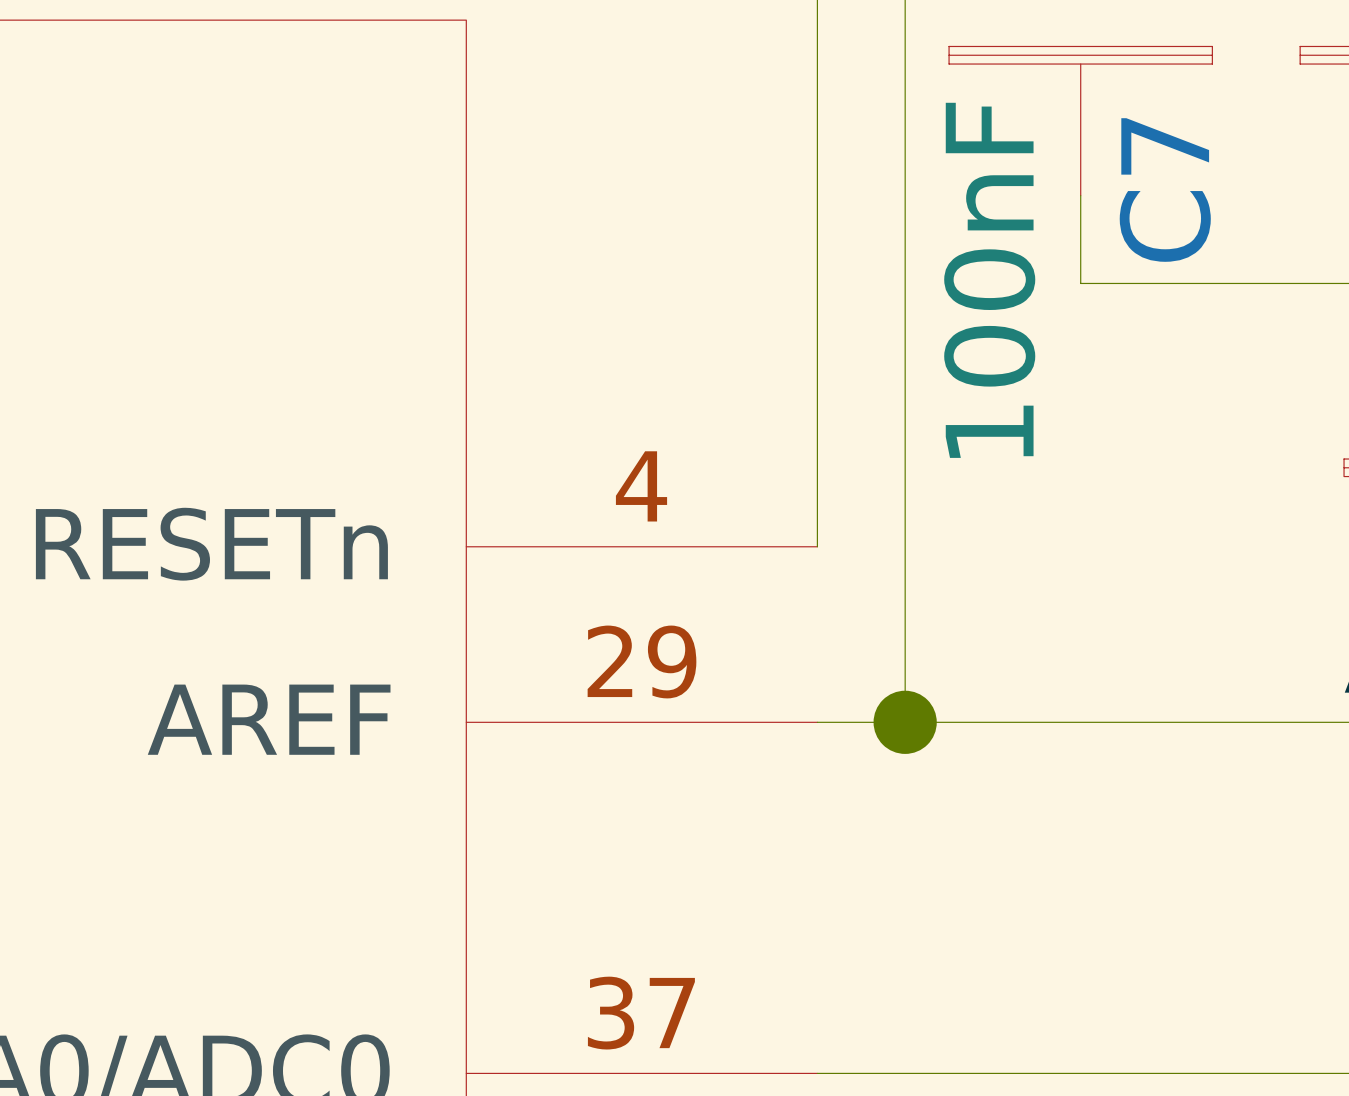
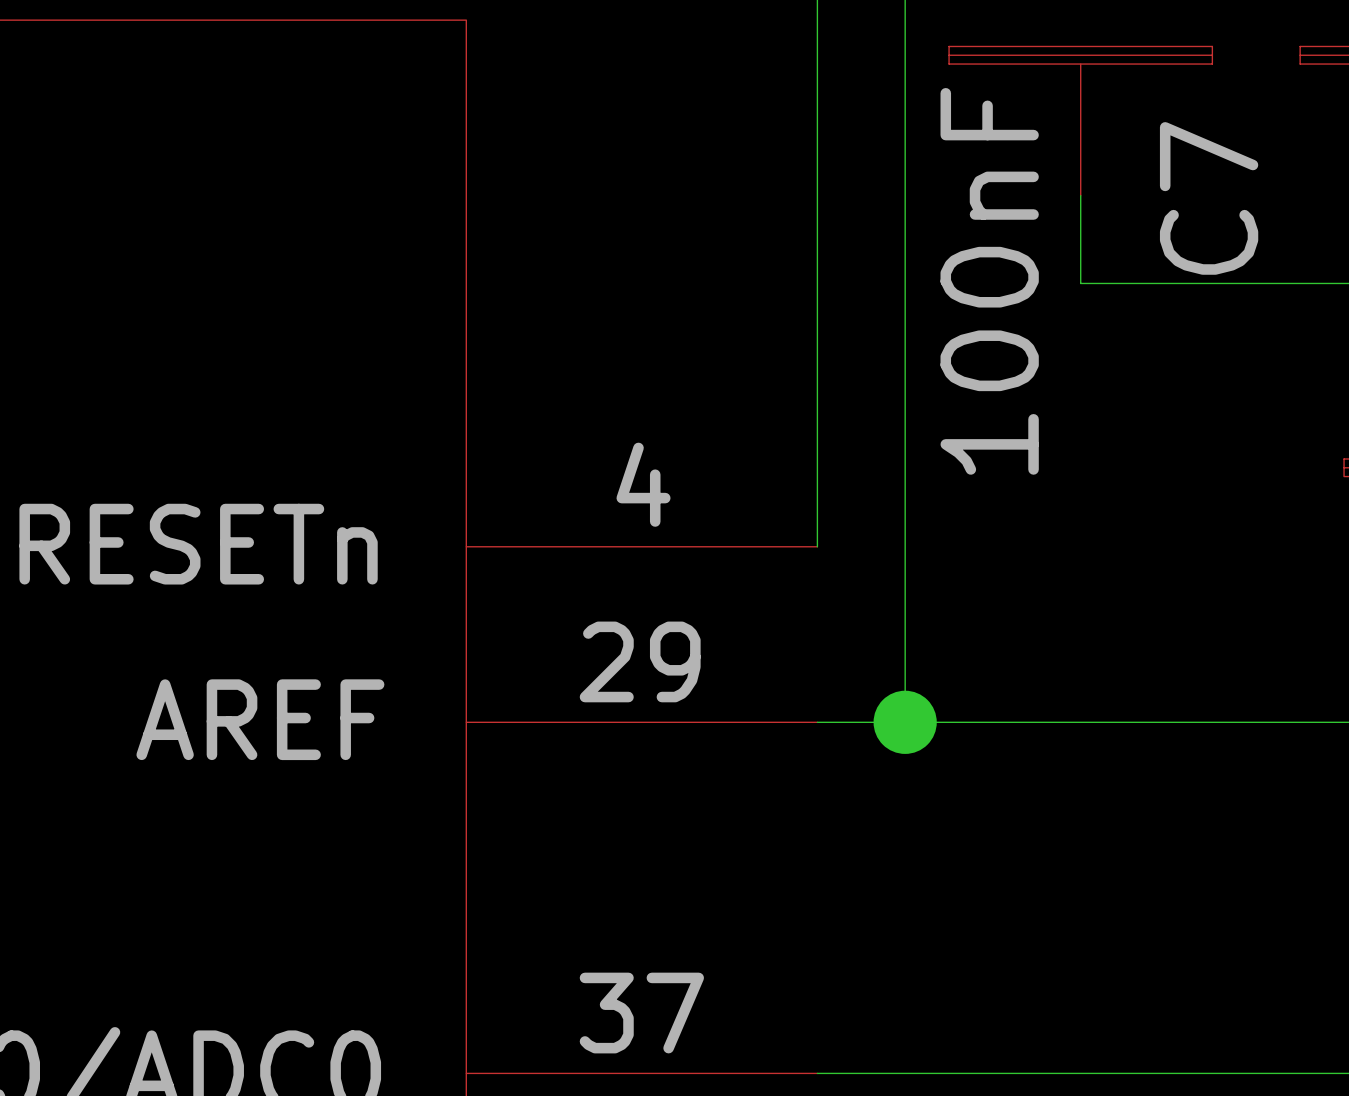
C7 name position: C7 (1165, 190) -> C7 (1209, 198)

